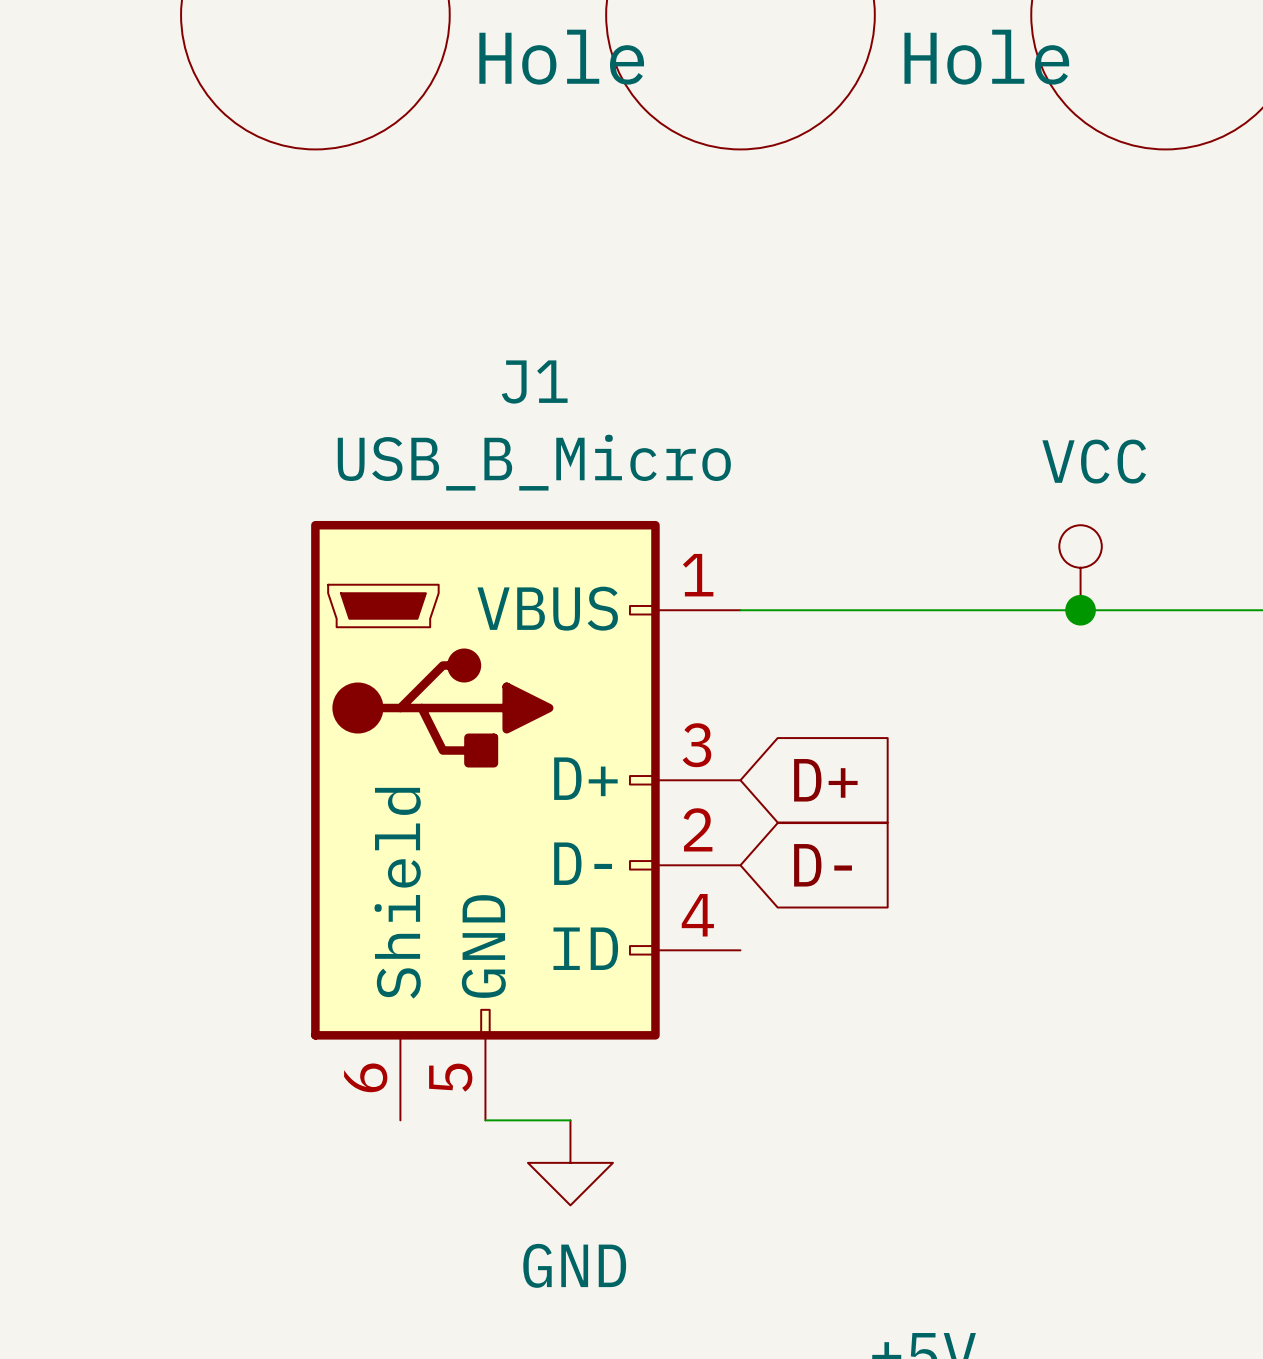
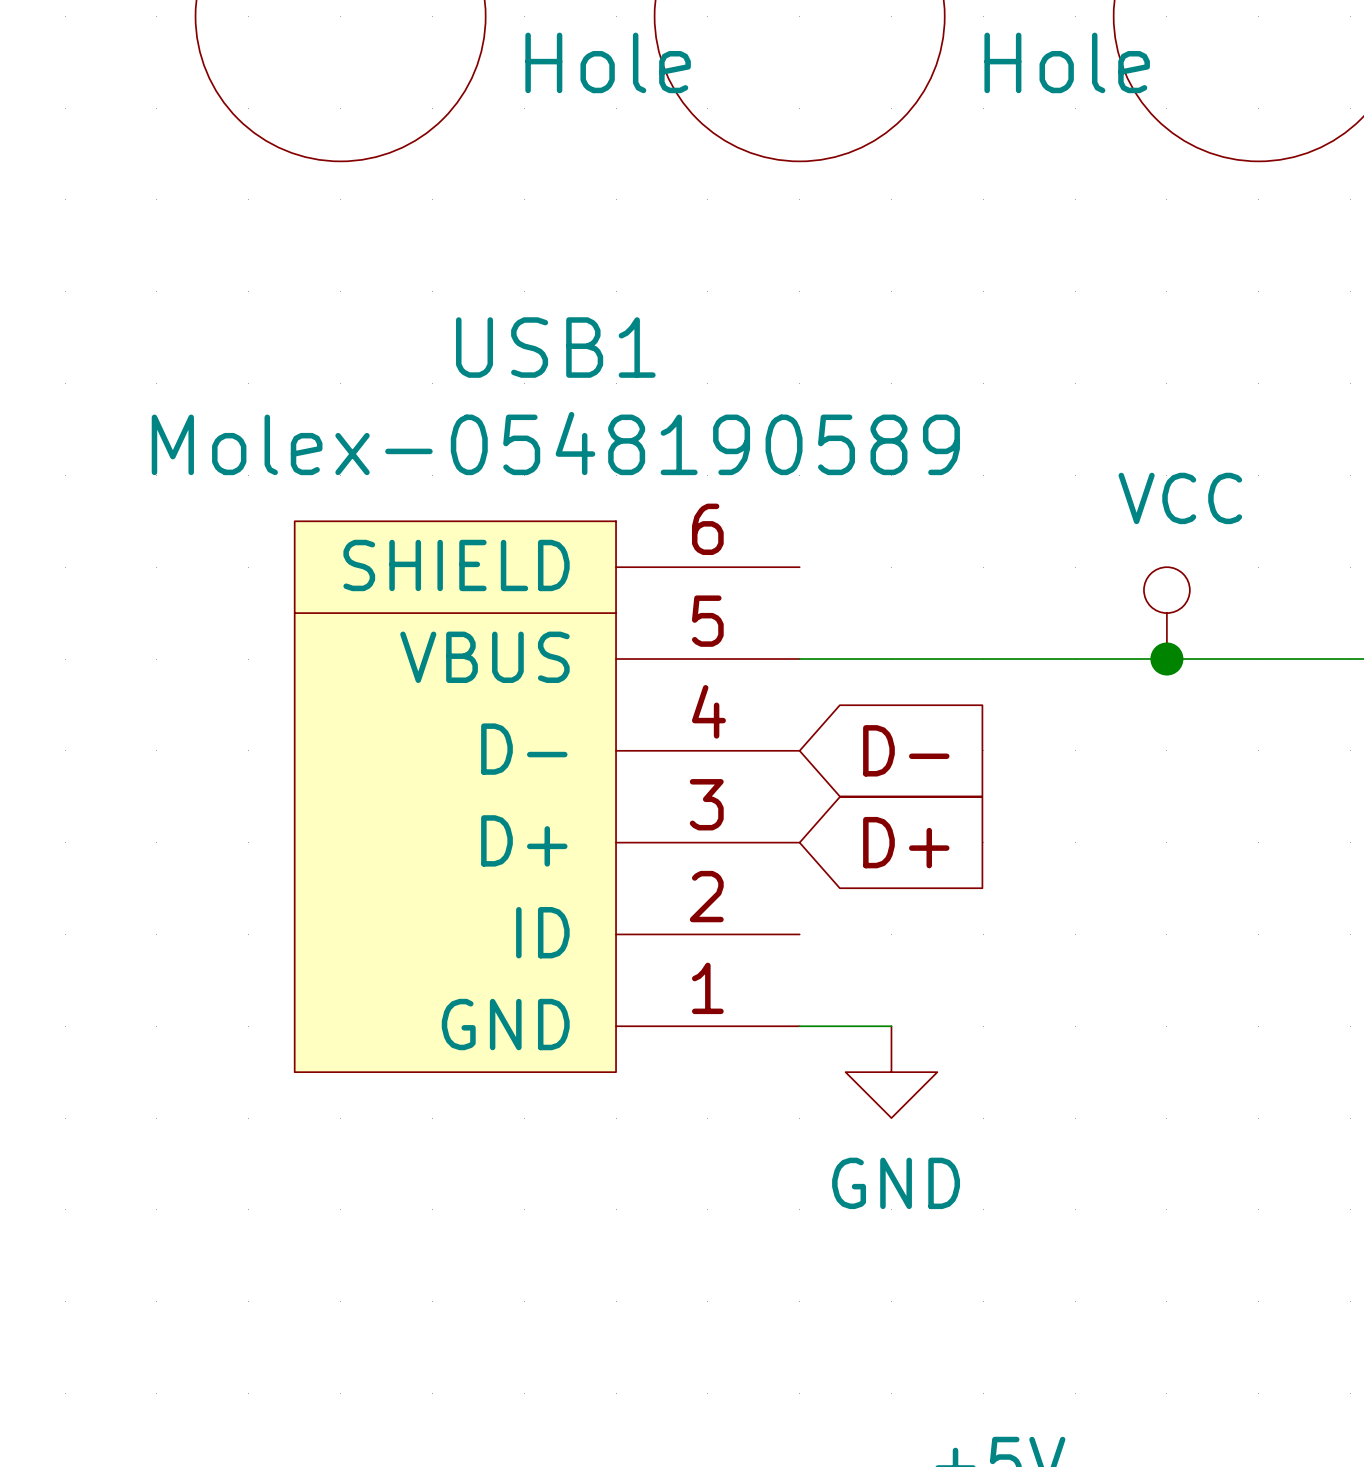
USB1: none -> Molex-0548190589 (547, 796)
J1: USB_B_Micro (525, 820) -> none
global label position: D- (823, 865) -> D- (906, 750)
wire: (485, 1120) (570, 1120) -> (799, 1026) (891, 1026)
power symbol position: GND (570, 1162) -> GND (891, 1072)

